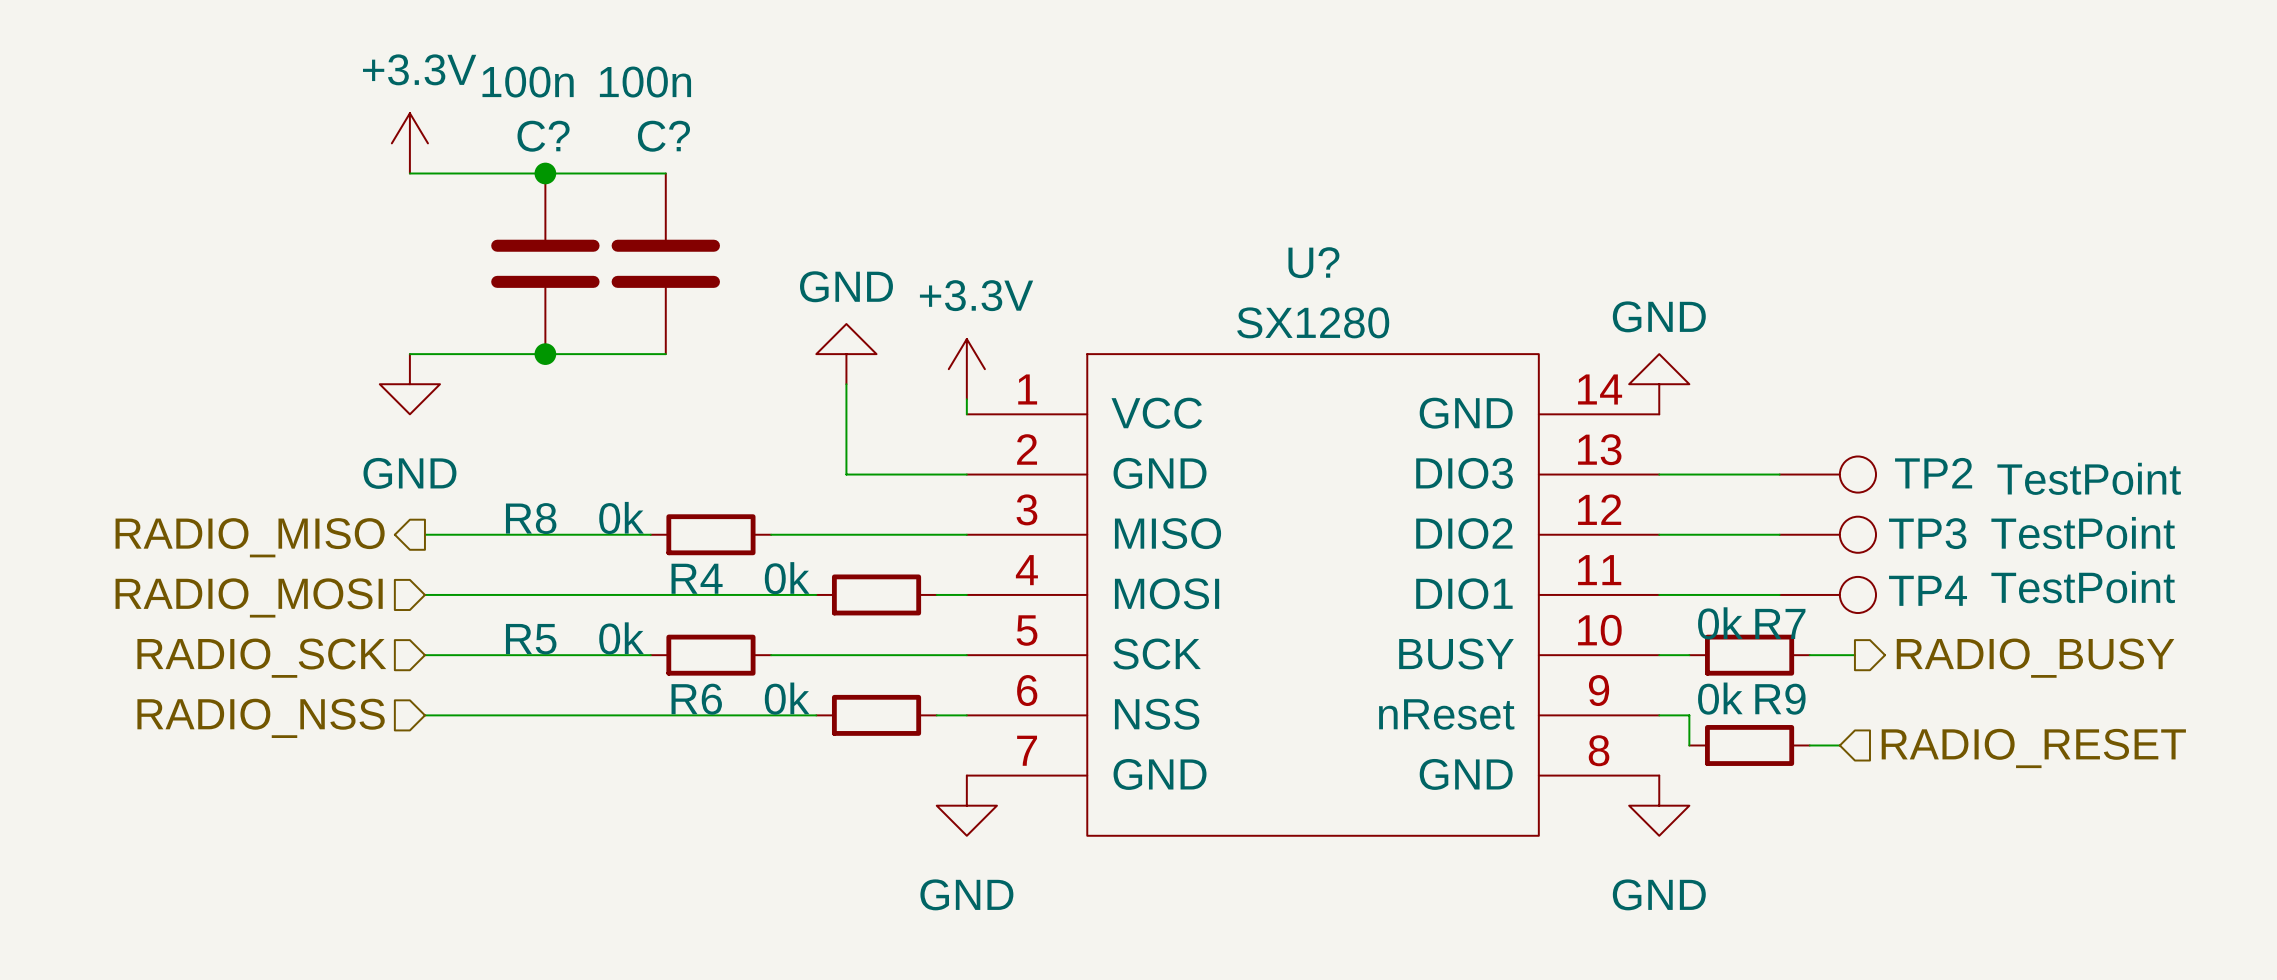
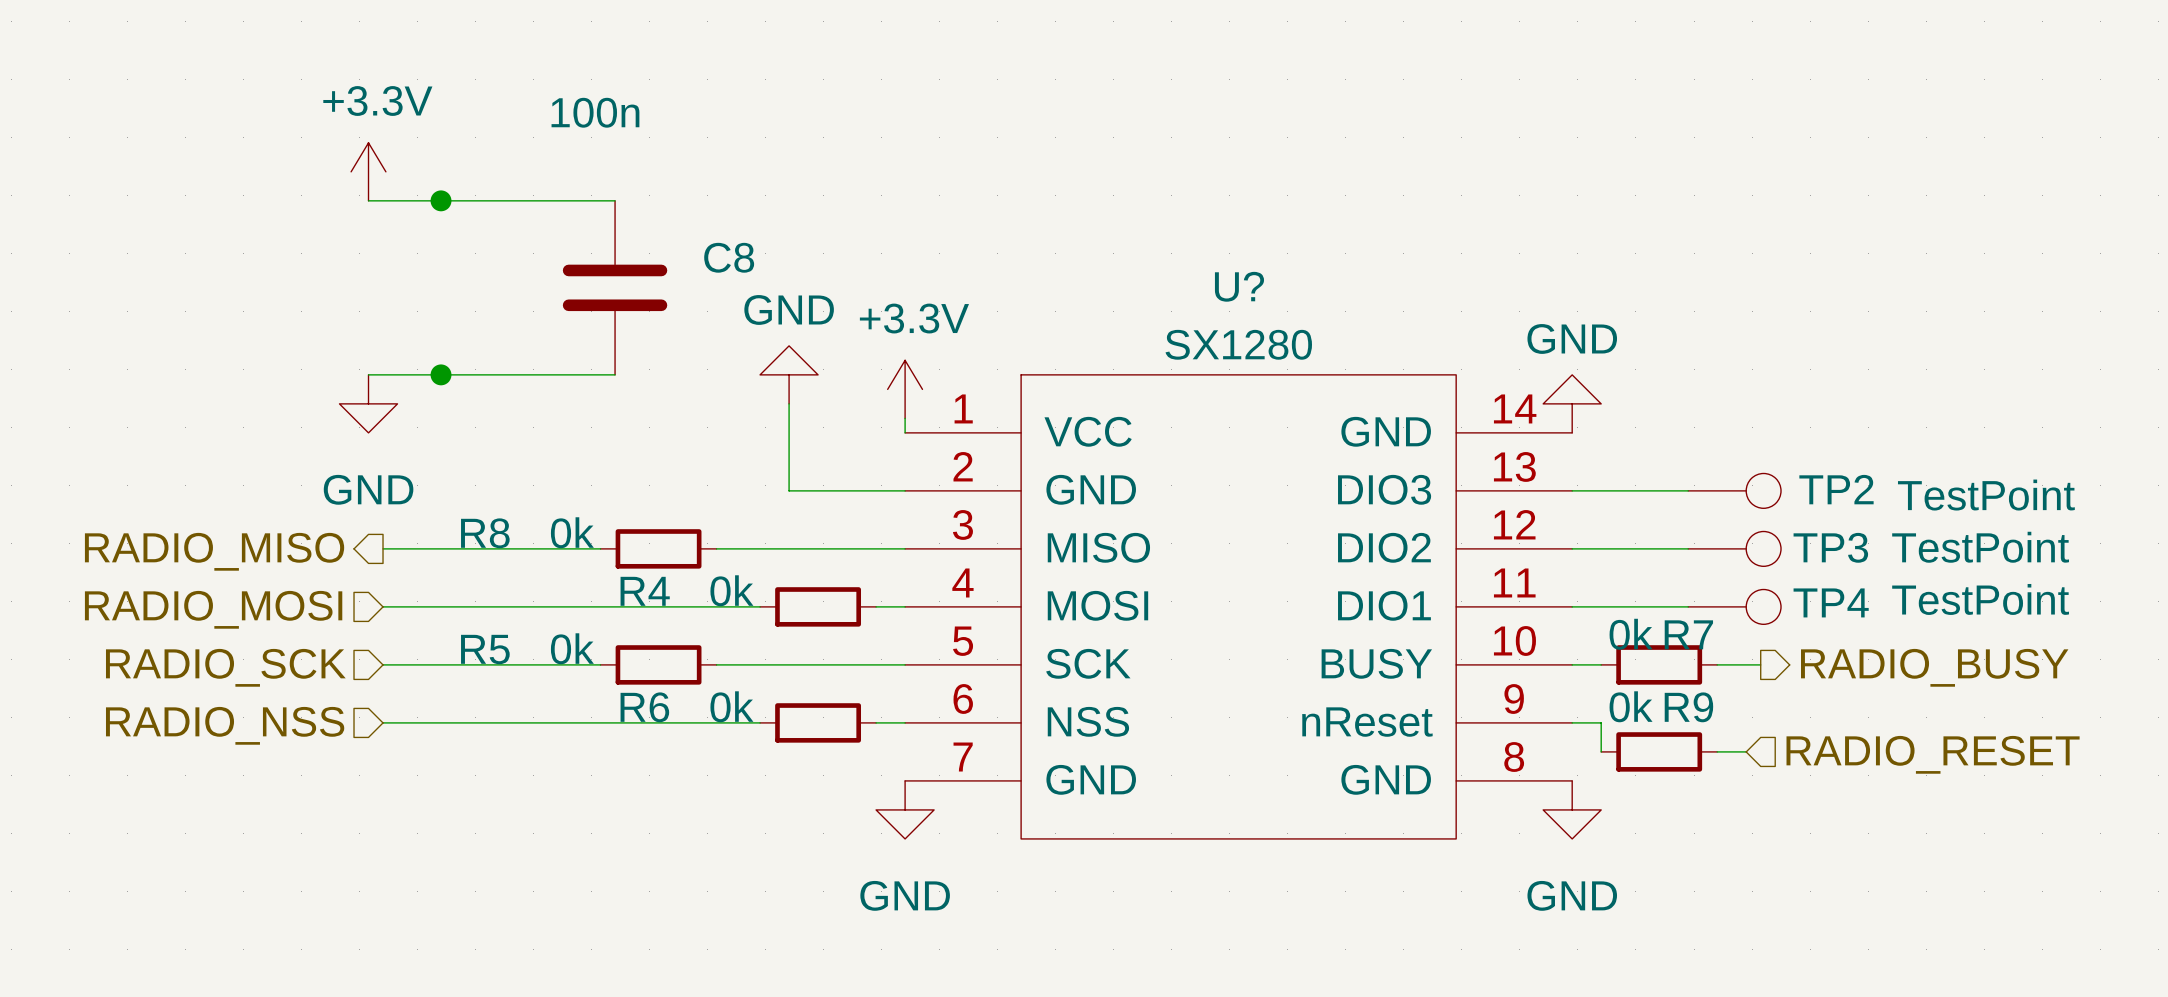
C? name: C? (663, 136) -> C8 (729, 257)
junction position: (545, 173) -> (441, 200)
C?: 100n (545, 263) -> none
junction position: (545, 354) -> (441, 374)

